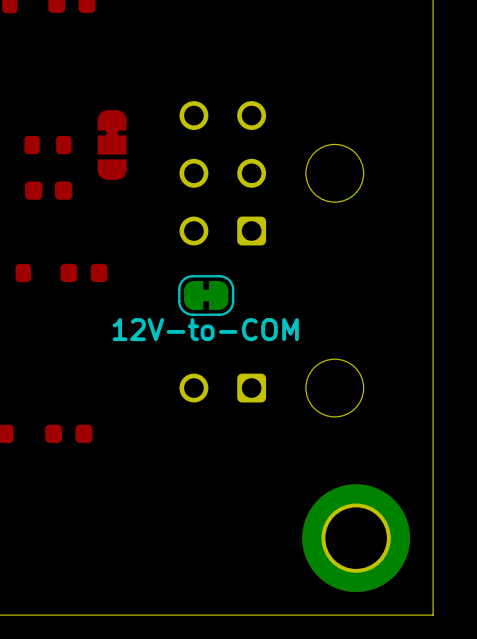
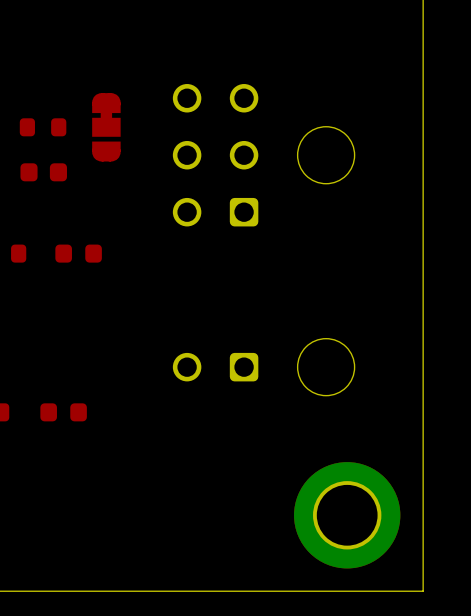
part: 12V-to-COM (206, 295) -> none

